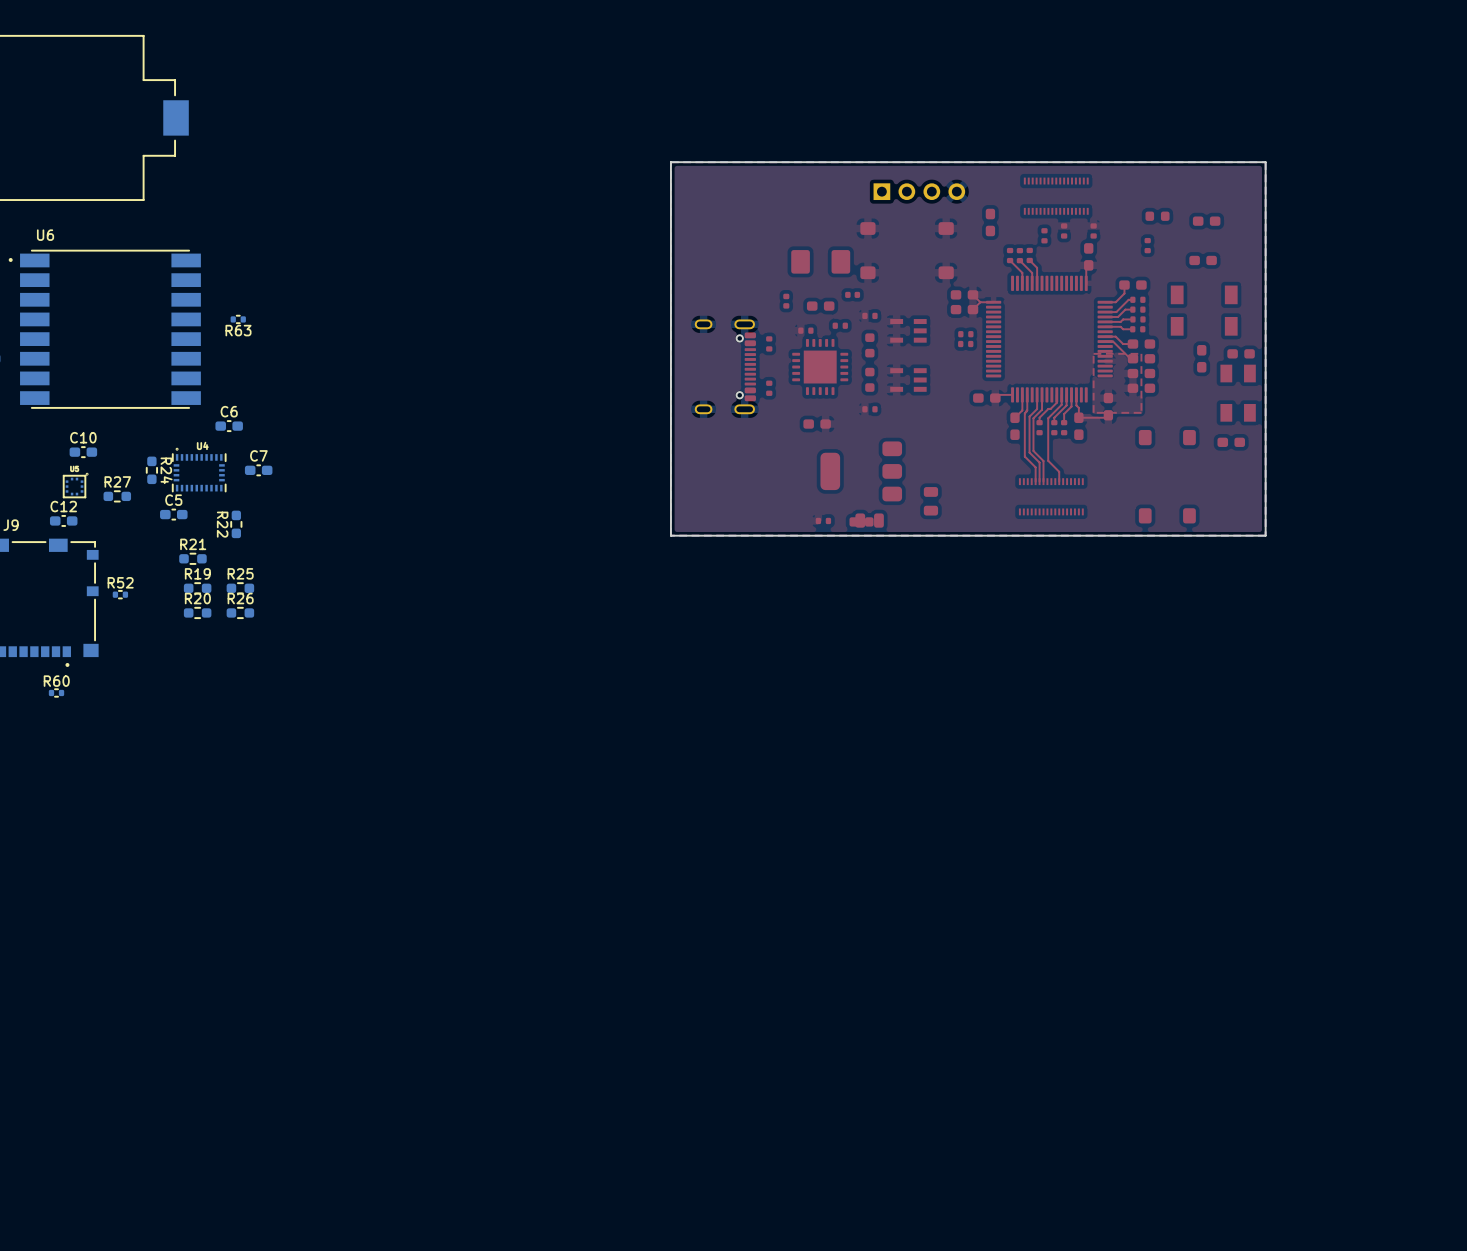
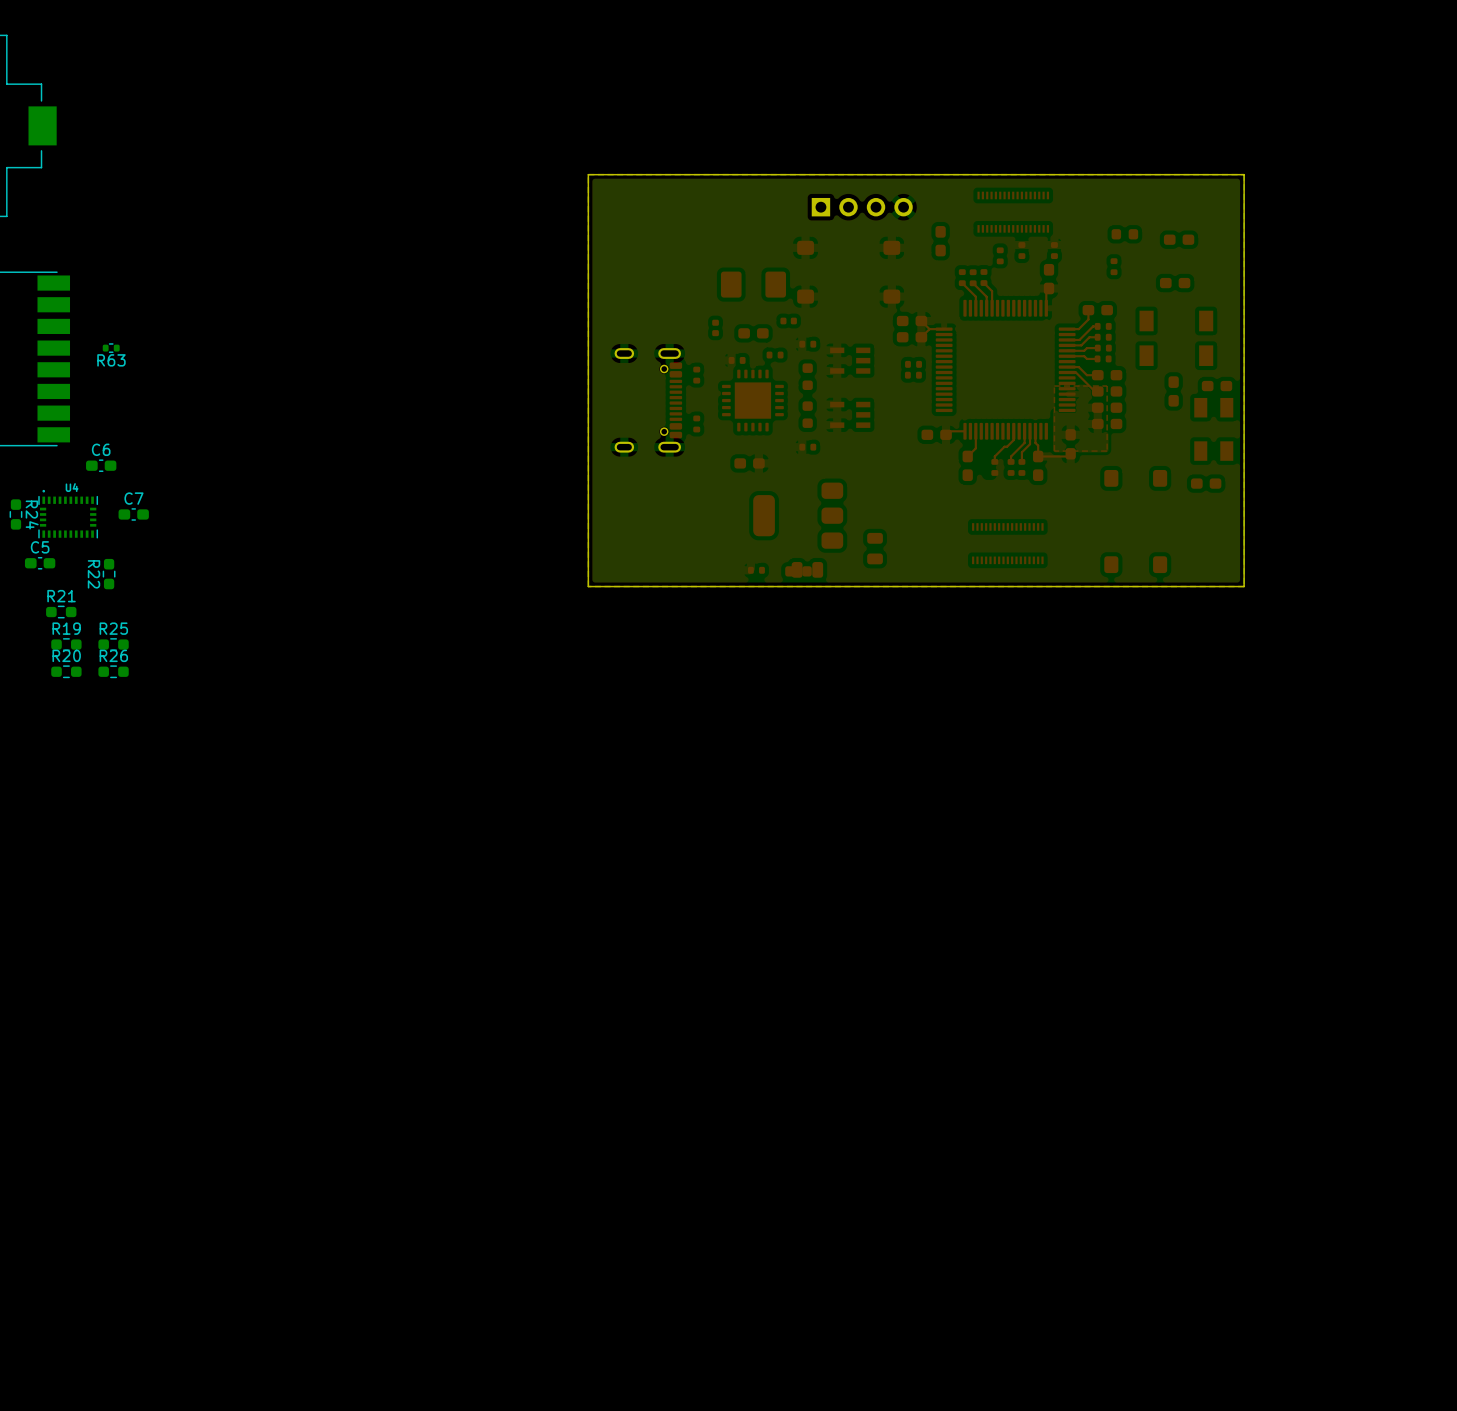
top track: (1027, 394) (1027, 410) (1024, 413) (1024, 456) (1035, 467) (1035, 481) -> none
top track: (1037, 394) (1037, 409) (1029, 416) (1029, 452) (1039, 462) (1039, 481) -> none
top track: (1042, 394) (1042, 409) (1033, 418) (1033, 450) (1043, 460) (1043, 481) -> none
top track: (1061, 394) (1061, 404) (1048, 418) (1048, 460) (1059, 471) (1059, 481) -> none

